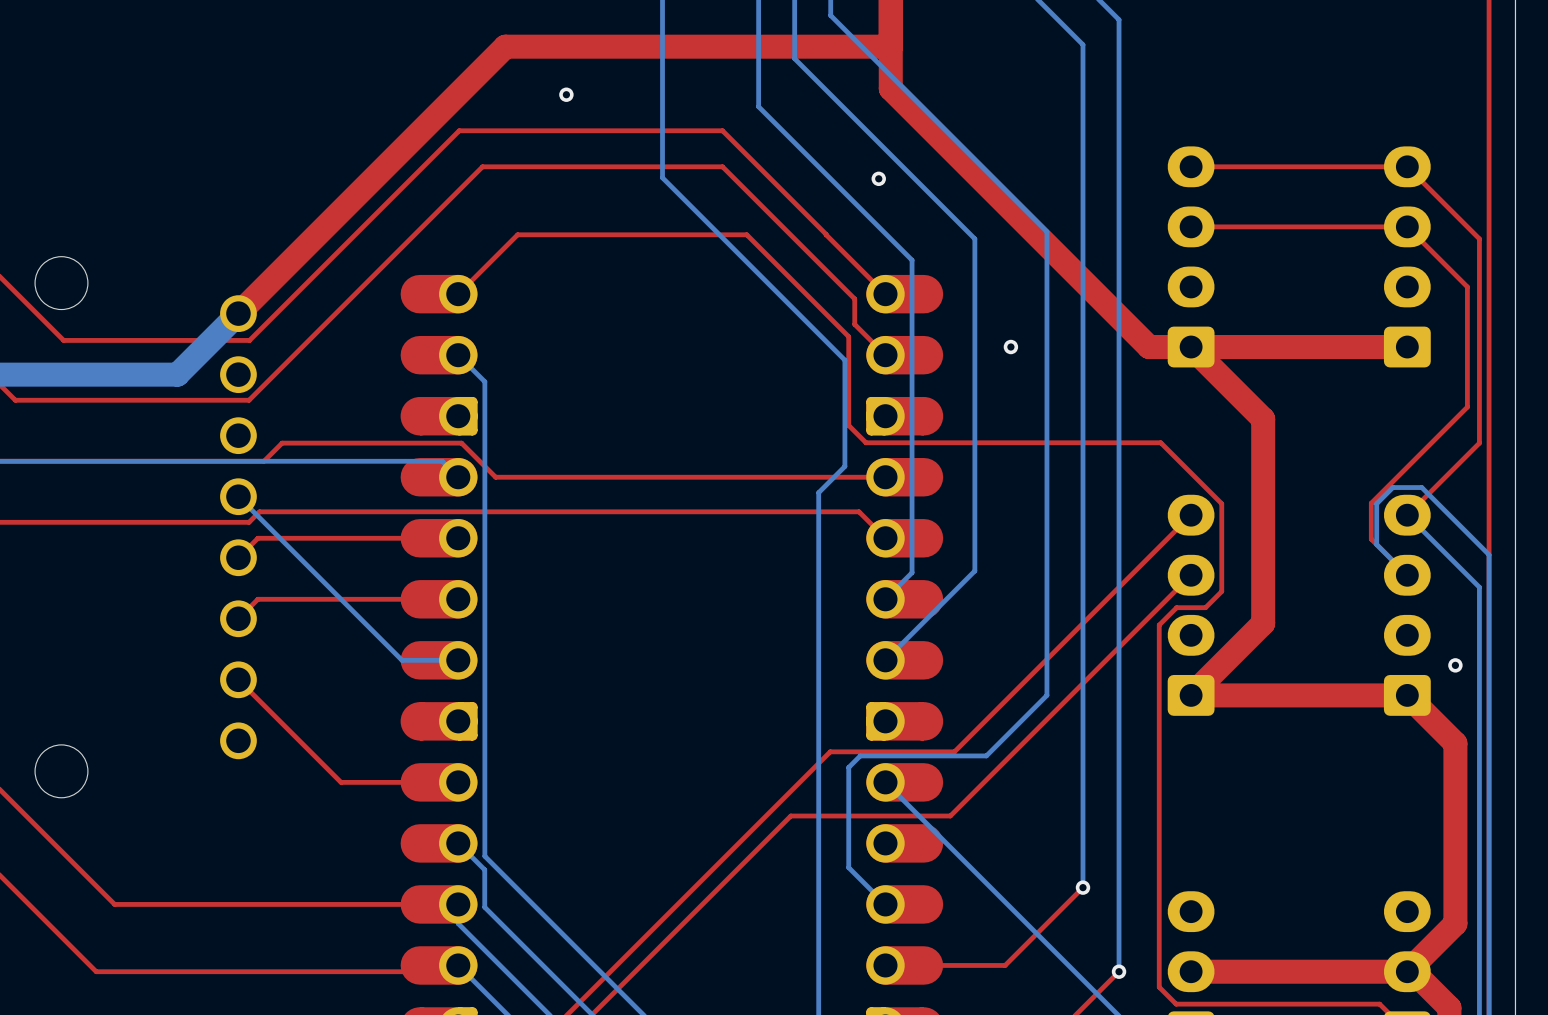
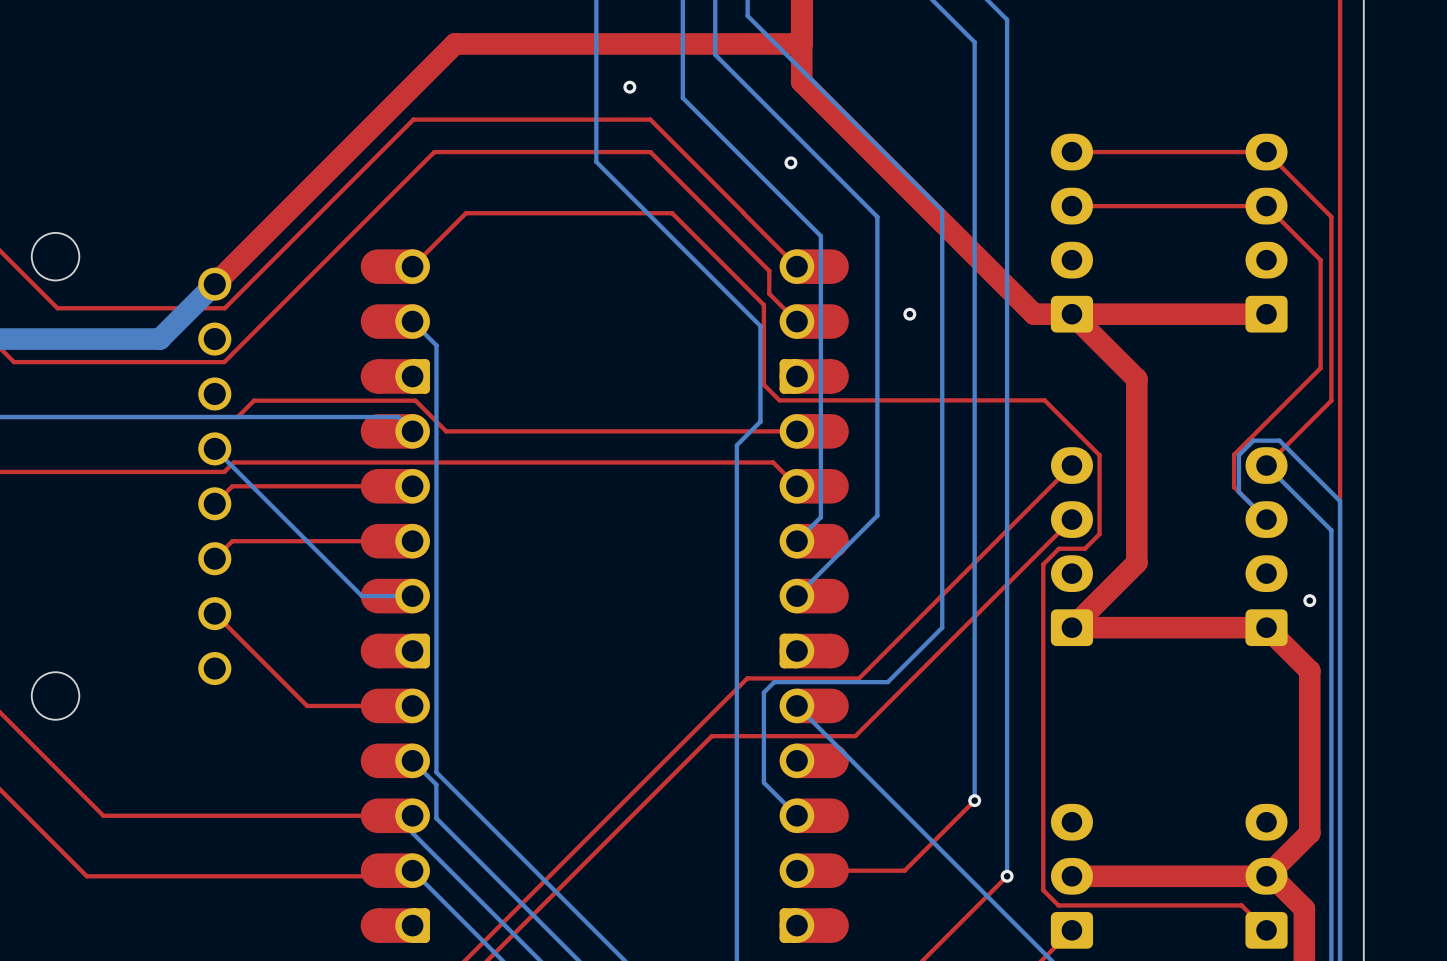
via position: (566, 94) -> (629, 87)

